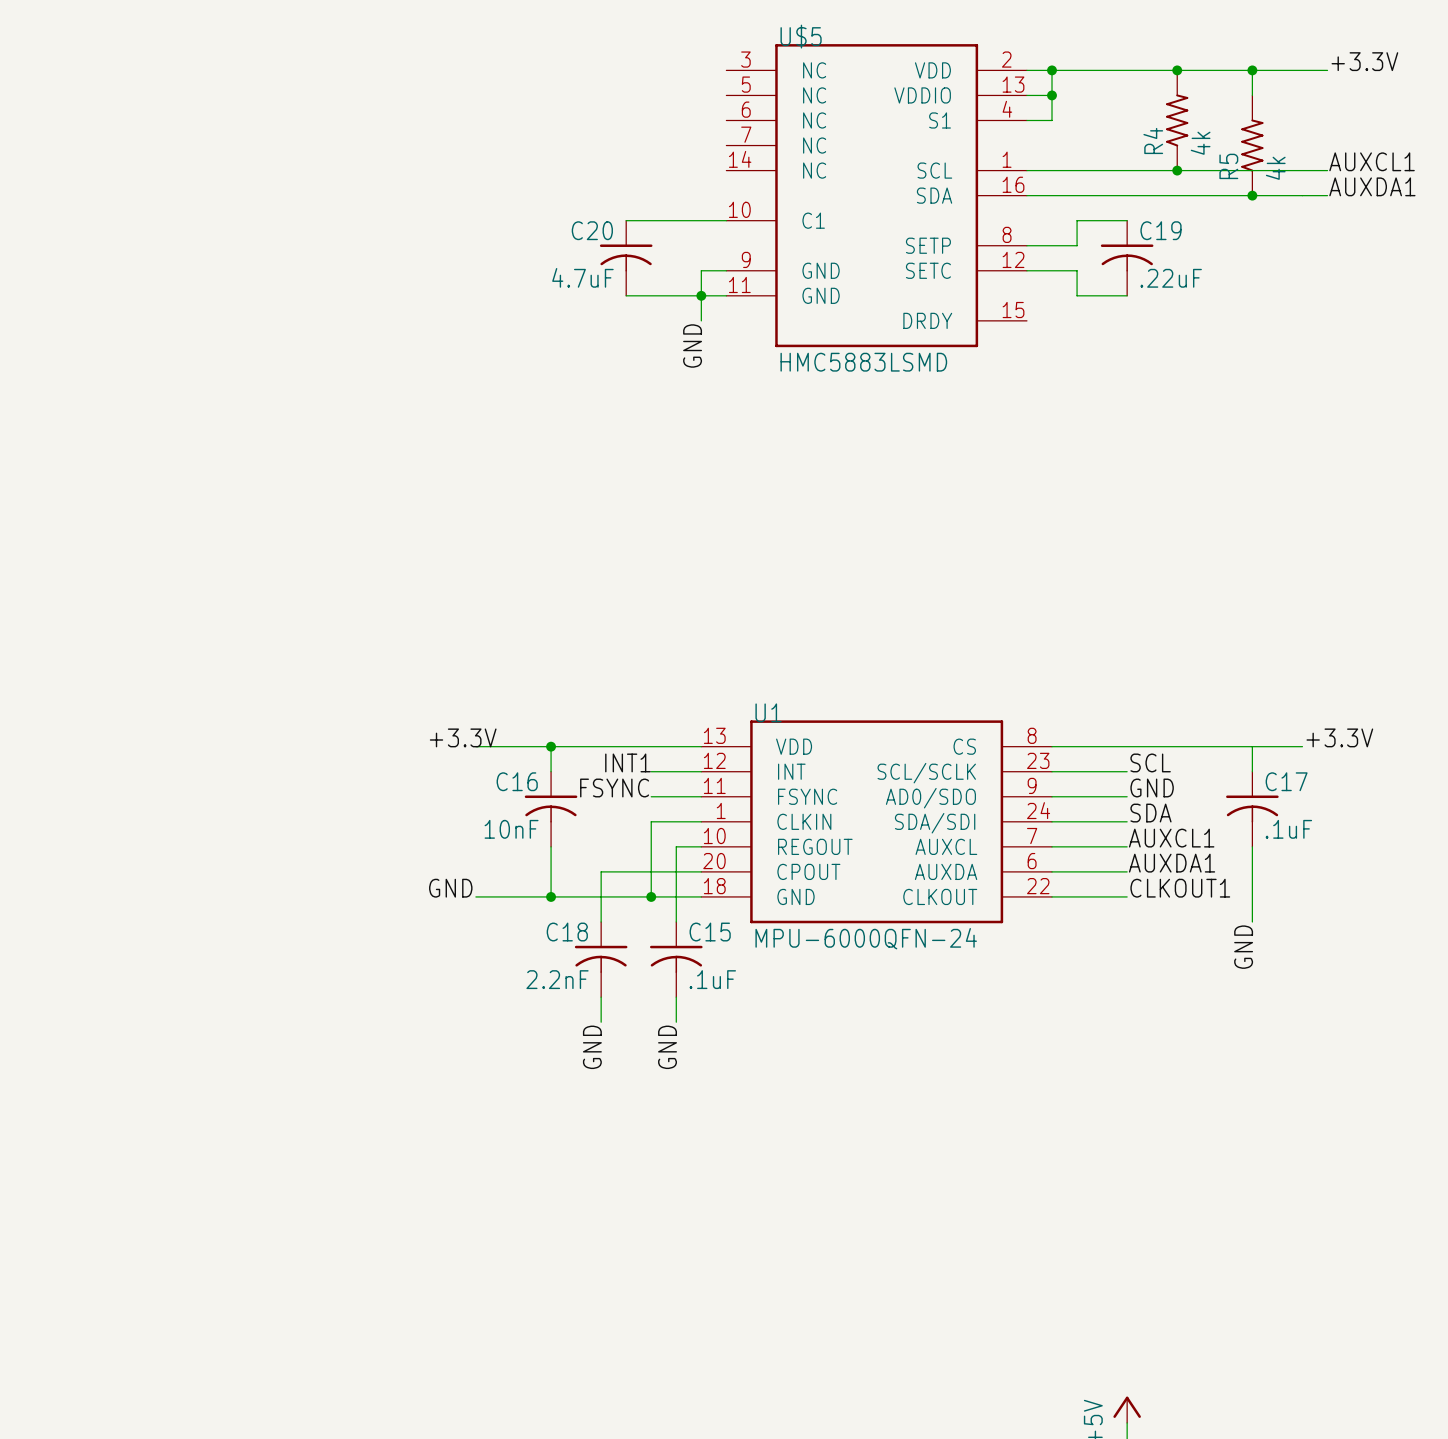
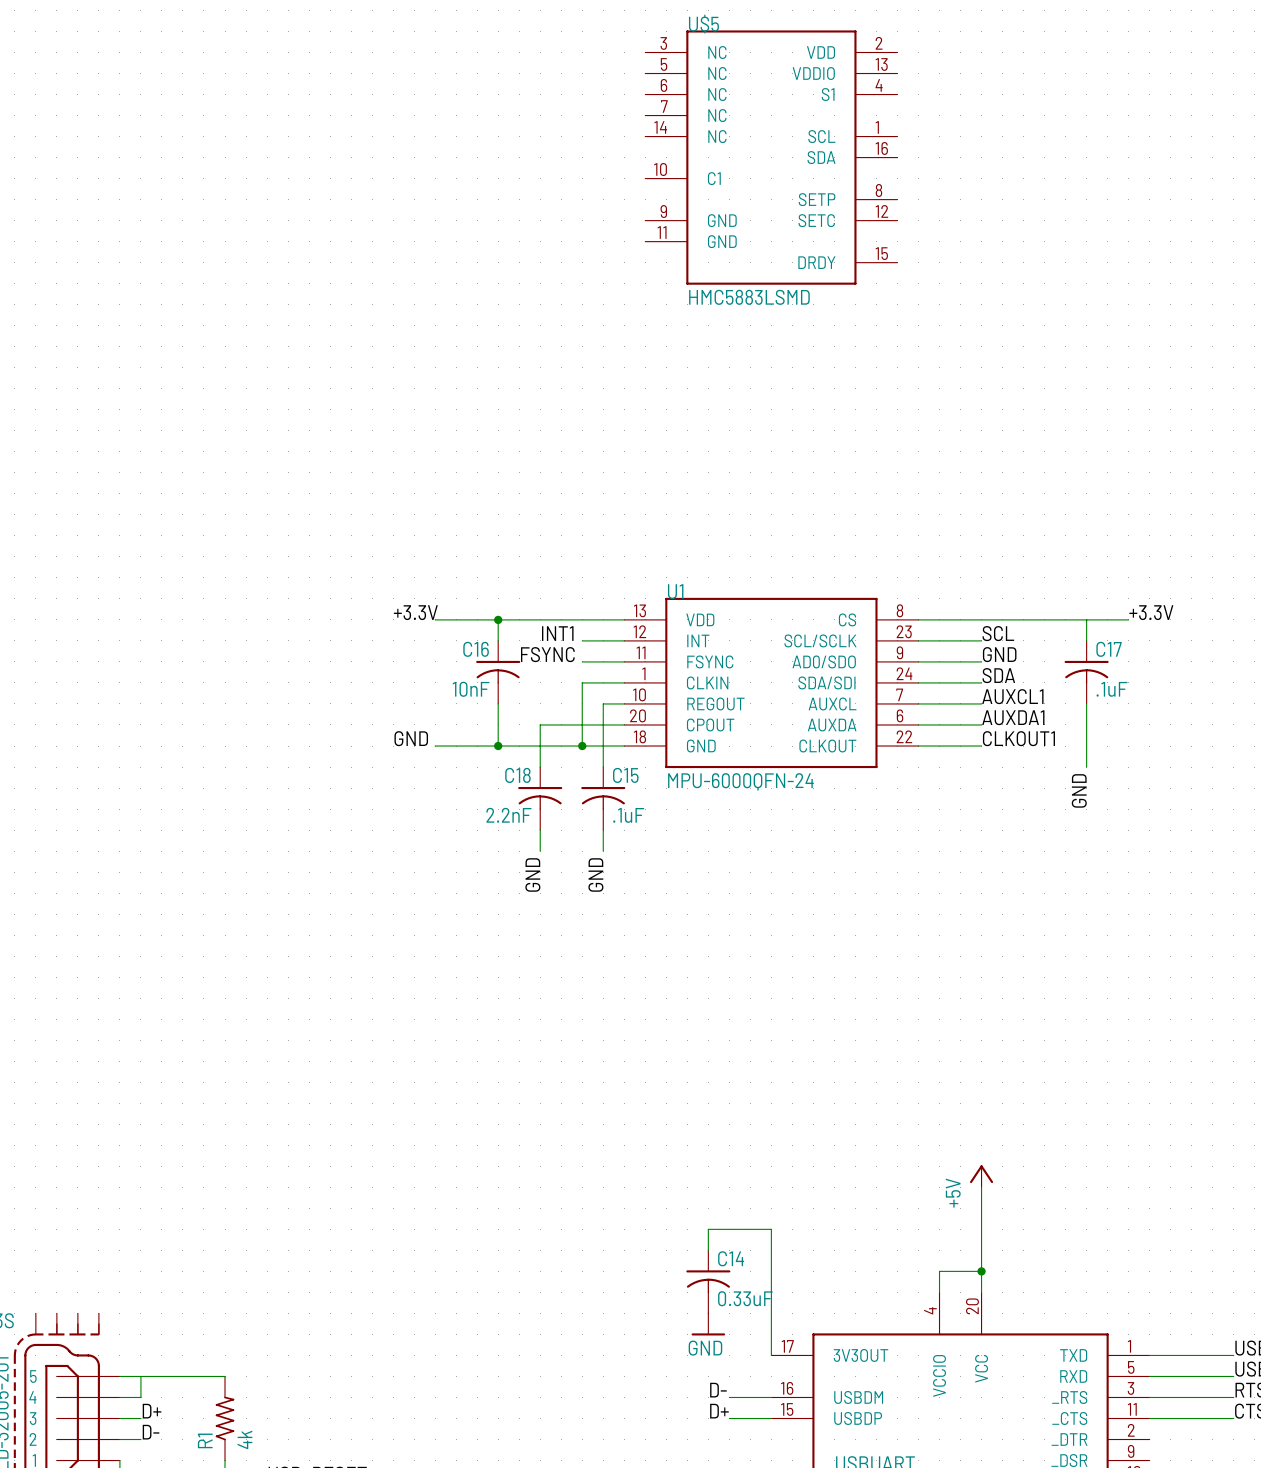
label: +3.3V (1364, 61) -> none
wire: (1026, 70) (1327, 70) -> none
wire: (1052, 70) (1052, 120) (1026, 120) -> none
junction: (1052, 70) -> none
junction: (1177, 70) -> none
wire: (1252, 70) (1252, 95) -> none
junction: (1252, 70) -> none
wire: (1026, 95) (1052, 95) -> none
junction: (1052, 95) -> none
R4: 4k (1177, 120) -> none
R5: 4k (1252, 145) -> none
label: AUXCL1 (1372, 161) -> none
wire: (1026, 170) (1327, 170) -> none
junction: (1177, 170) -> none
label: AUXDA1 (1372, 186) -> none
wire: (1026, 195) (1327, 195) -> none
junction: (1252, 195) -> none
wire: (626, 220) (726, 220) -> none
wire: (1127, 220) (1077, 220) (1077, 245) (1026, 245) -> none
C20: 4.7uF (626, 258) -> none
C19: .22uF (1127, 258) -> none
wire: (726, 270) (701, 270) (701, 320) -> none
wire: (1026, 270) (1077, 270) (1077, 295) (1127, 295) -> none
wire: (626, 295) (726, 295) -> none
junction: (701, 295) -> none
label: GND (692, 345) -> none

